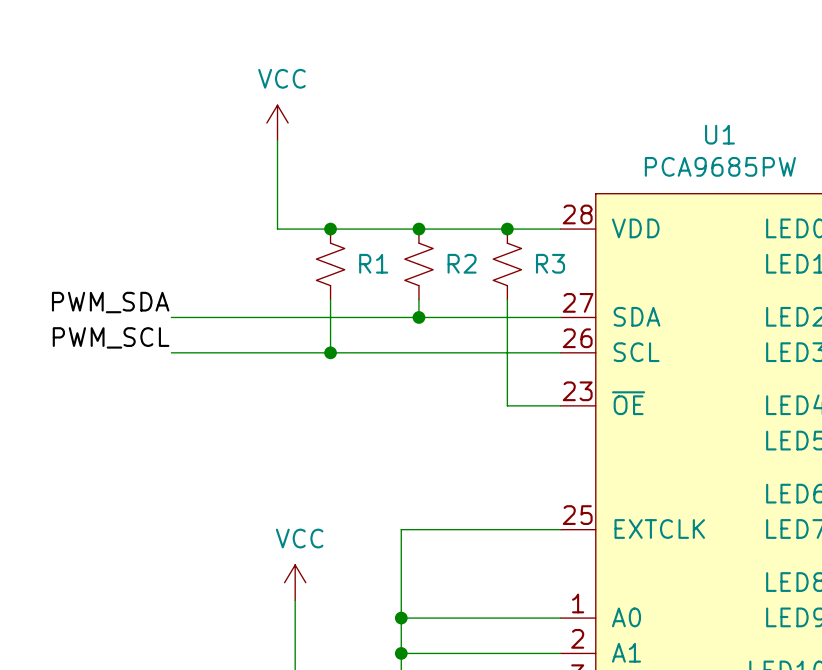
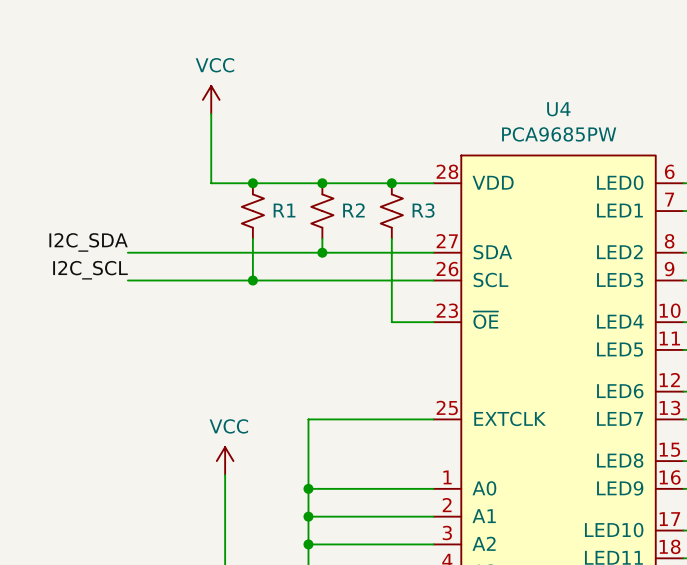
U1 name: U1 (719, 134) -> U4 (558, 109)
label: PWM_SDA (110, 302) -> I2C_SDA (88, 242)
label: PWM_SCL (111, 337) -> I2C_SCL (90, 270)

